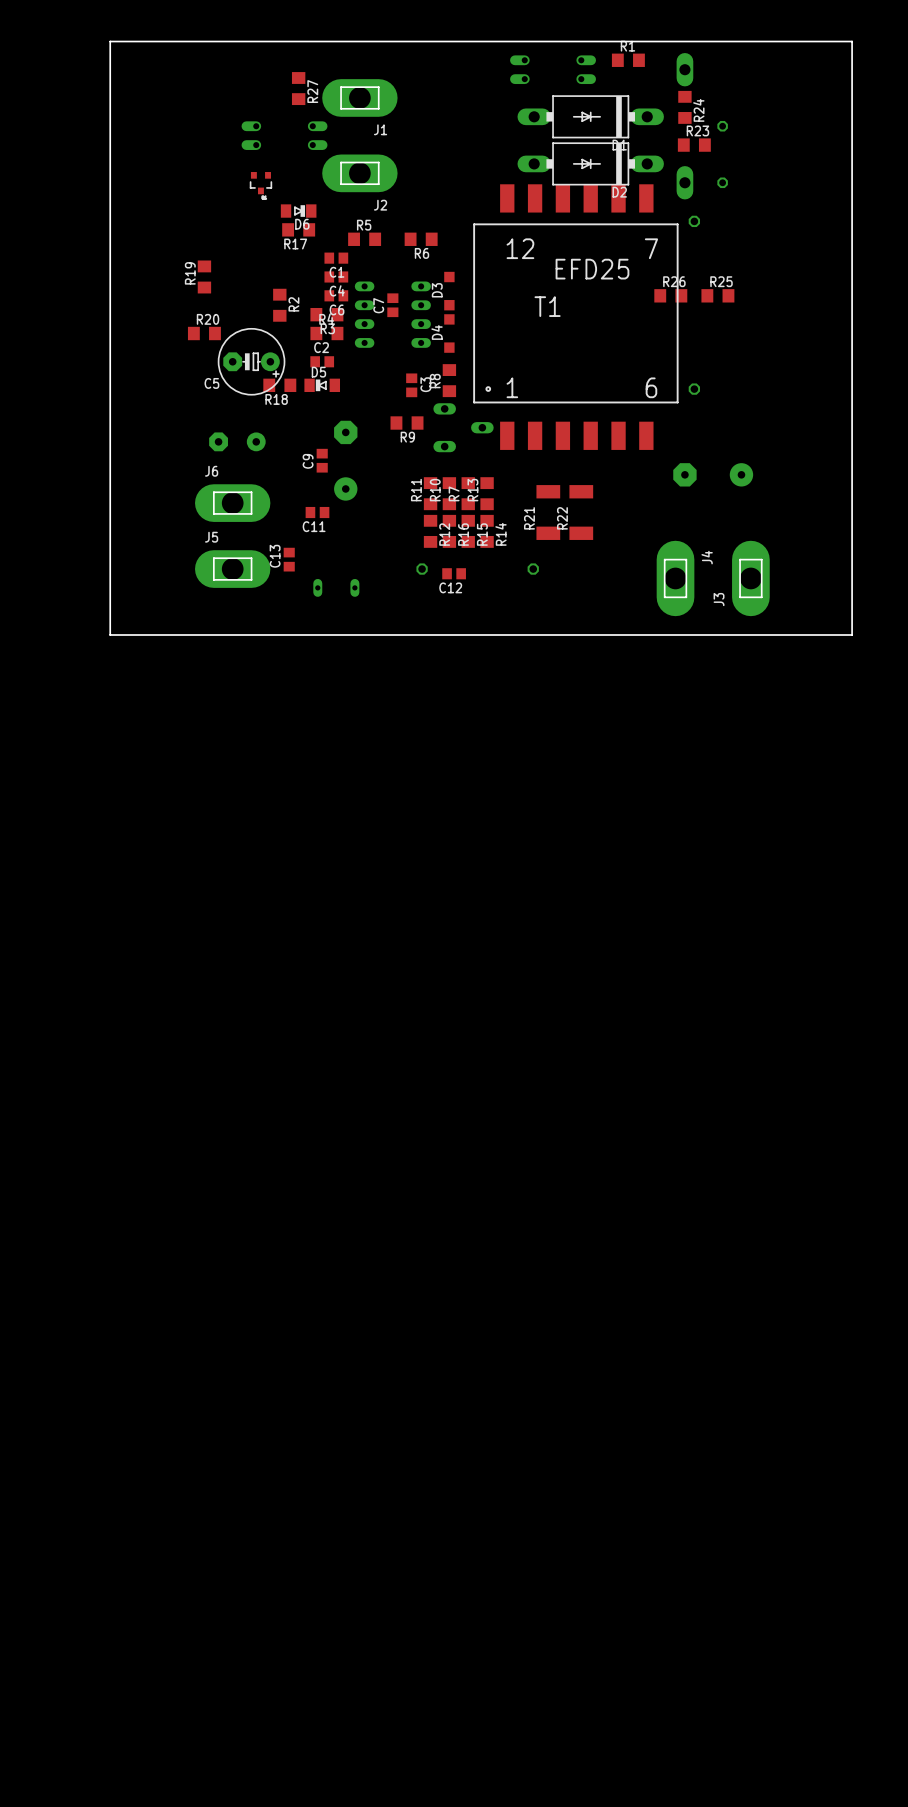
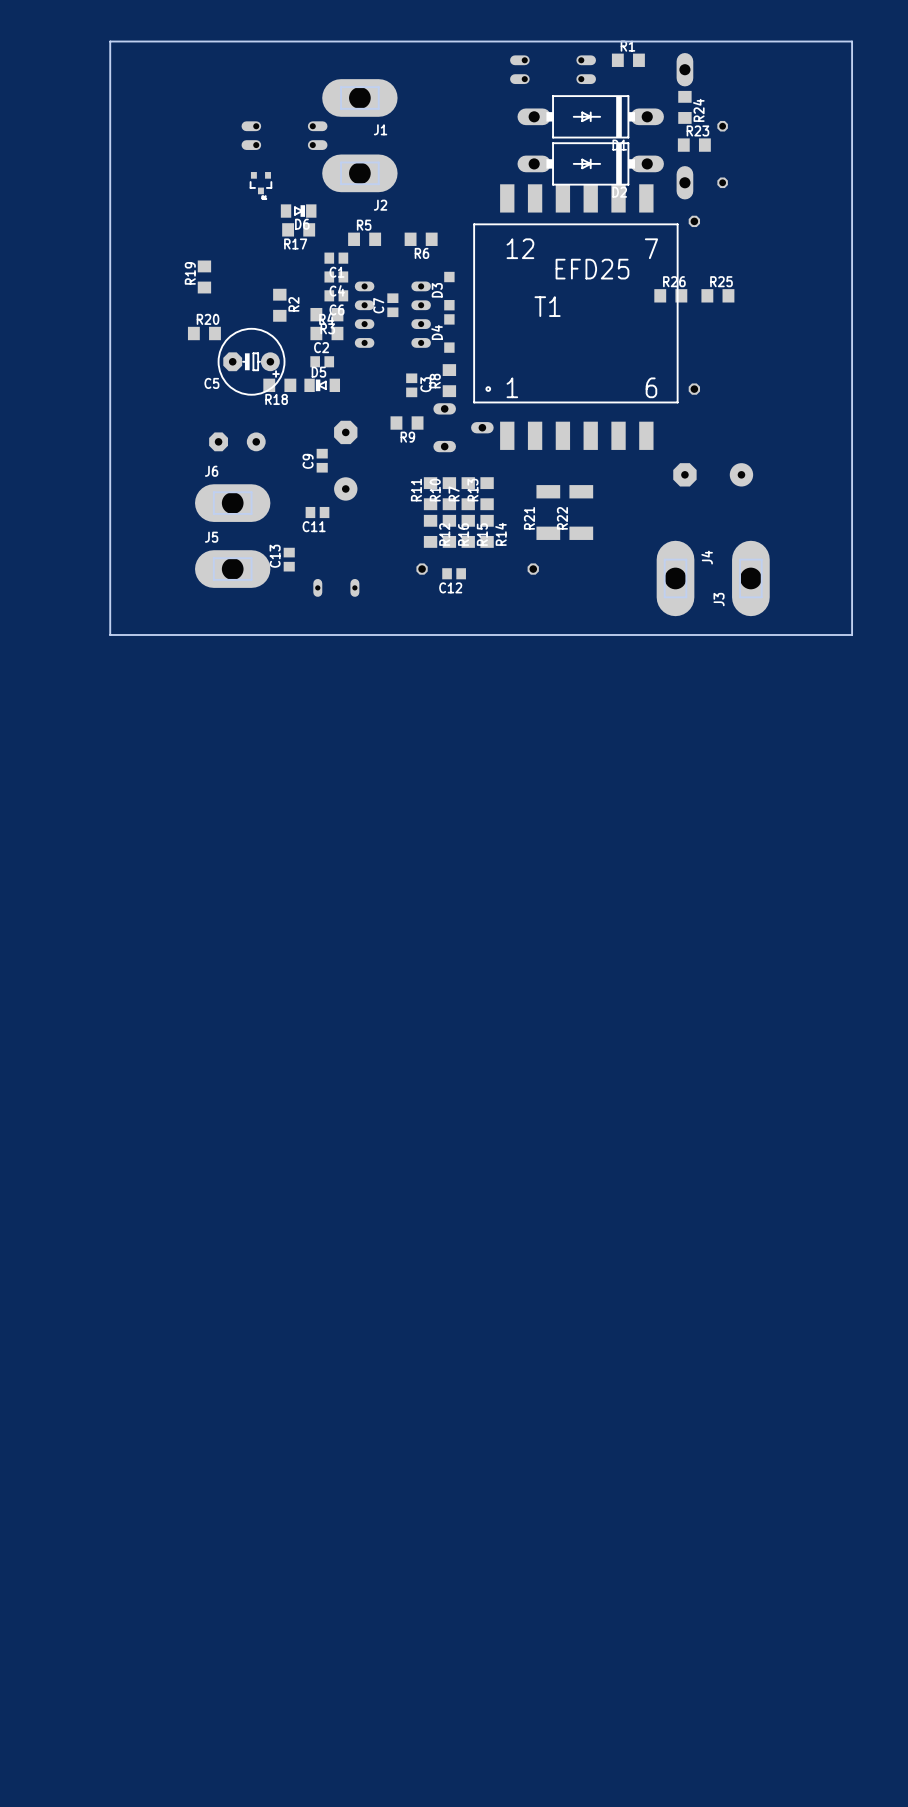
R27: (298, 88) -> none

